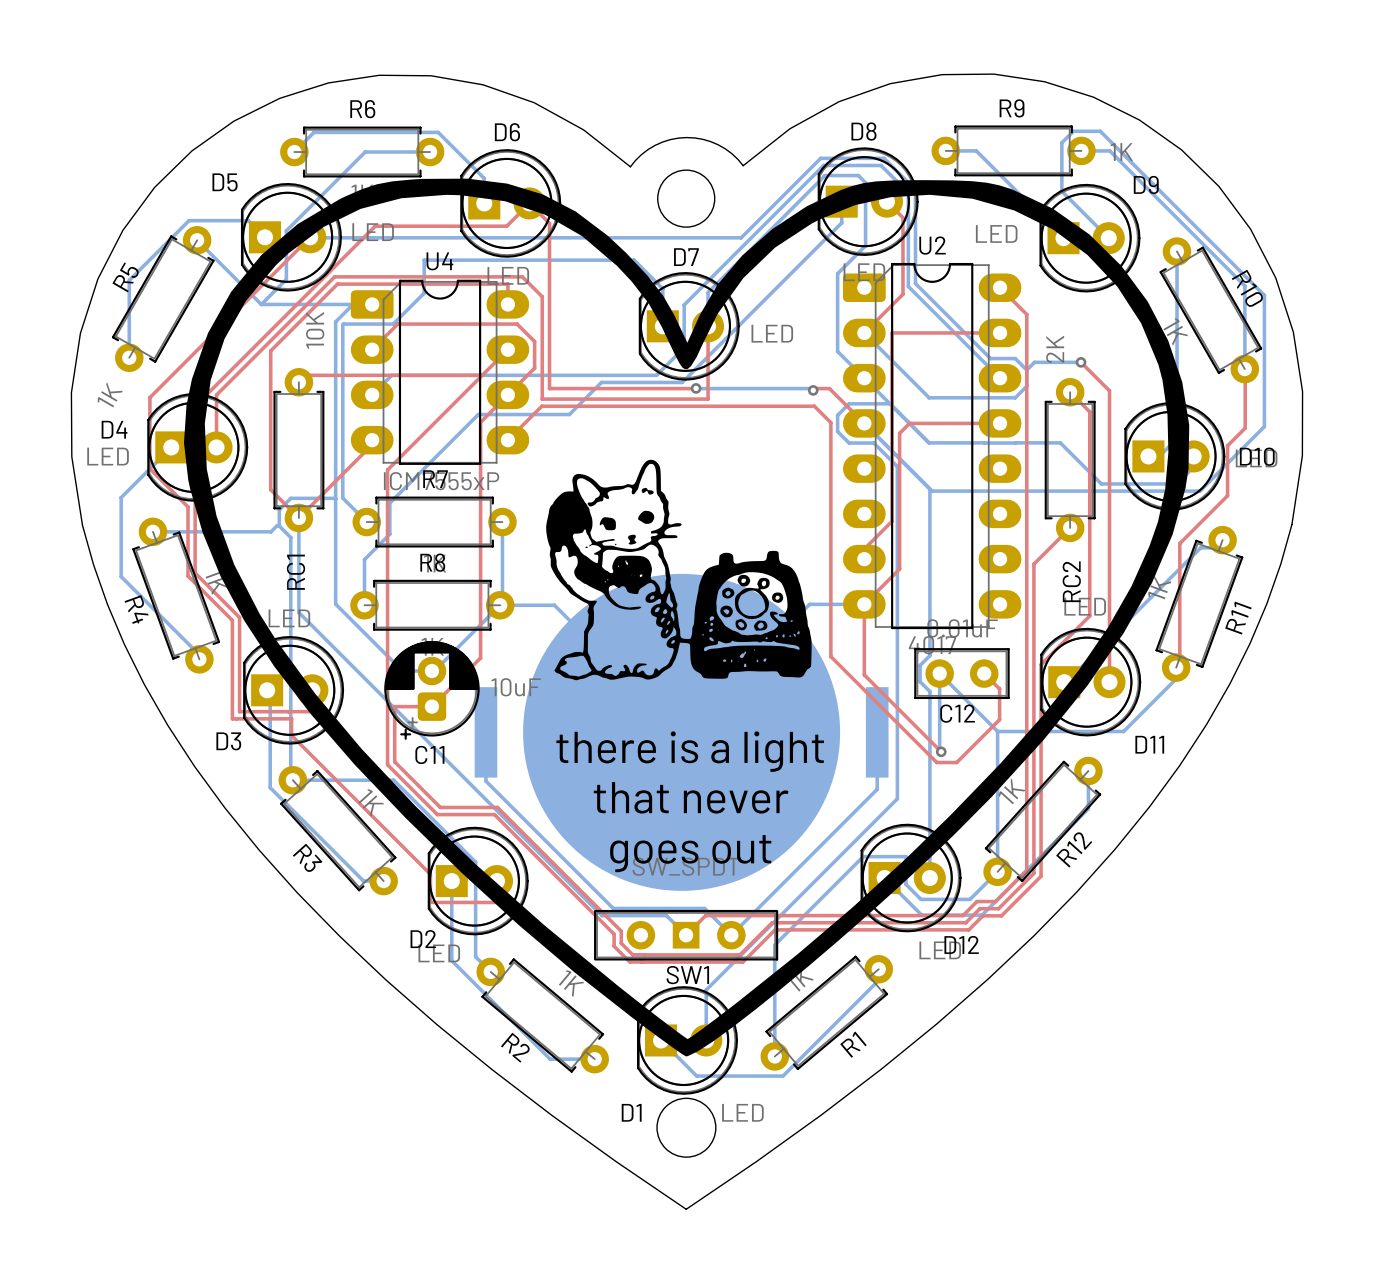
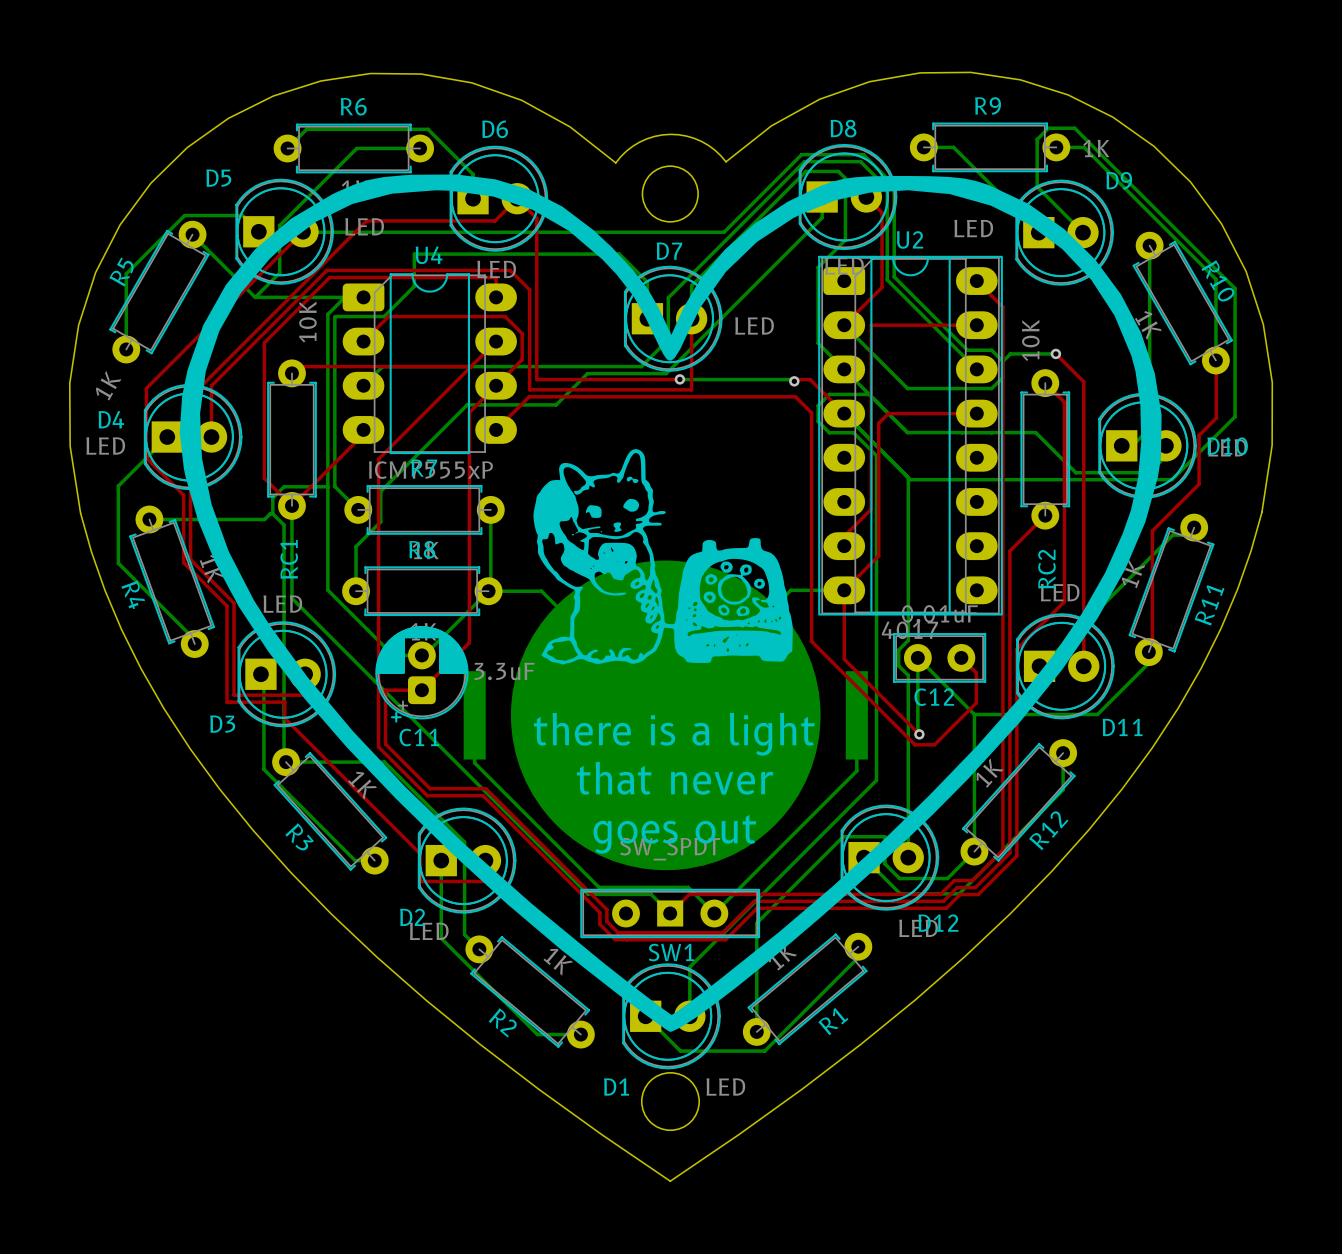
U2 footprint: [842, 262, 1022, 630] -> [818, 255, 1003, 616]
RC2 value: 2K (1055, 349) -> 10K (1030, 340)
C11 value: 10uF (516, 687) -> 3.3uF (504, 671)

